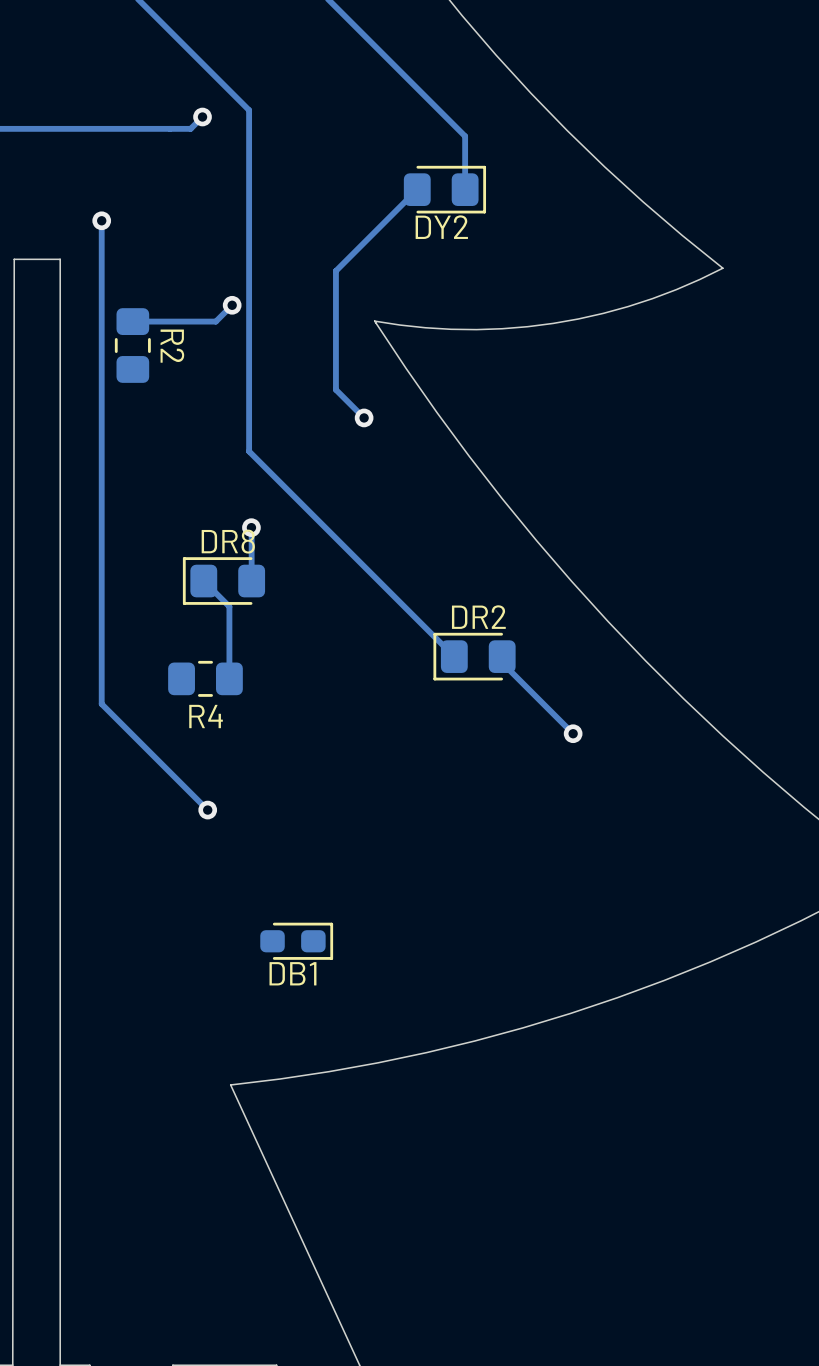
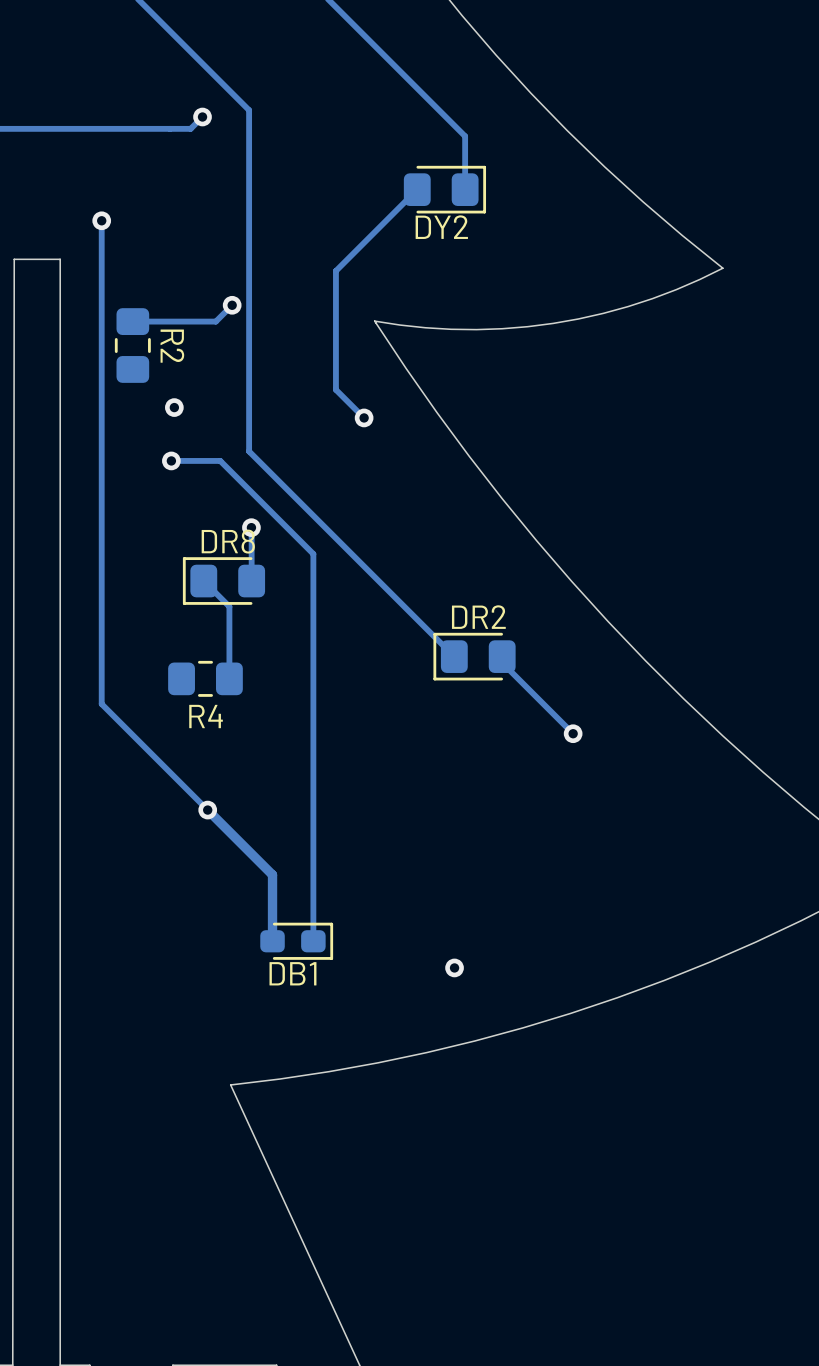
via: none -> (174, 407)
track: none -> (171, 460) (220, 460) (313, 554) (313, 941)
via: none -> (171, 460)
track: none -> (207, 810) (272, 874) (272, 941)
via: none -> (454, 967)

